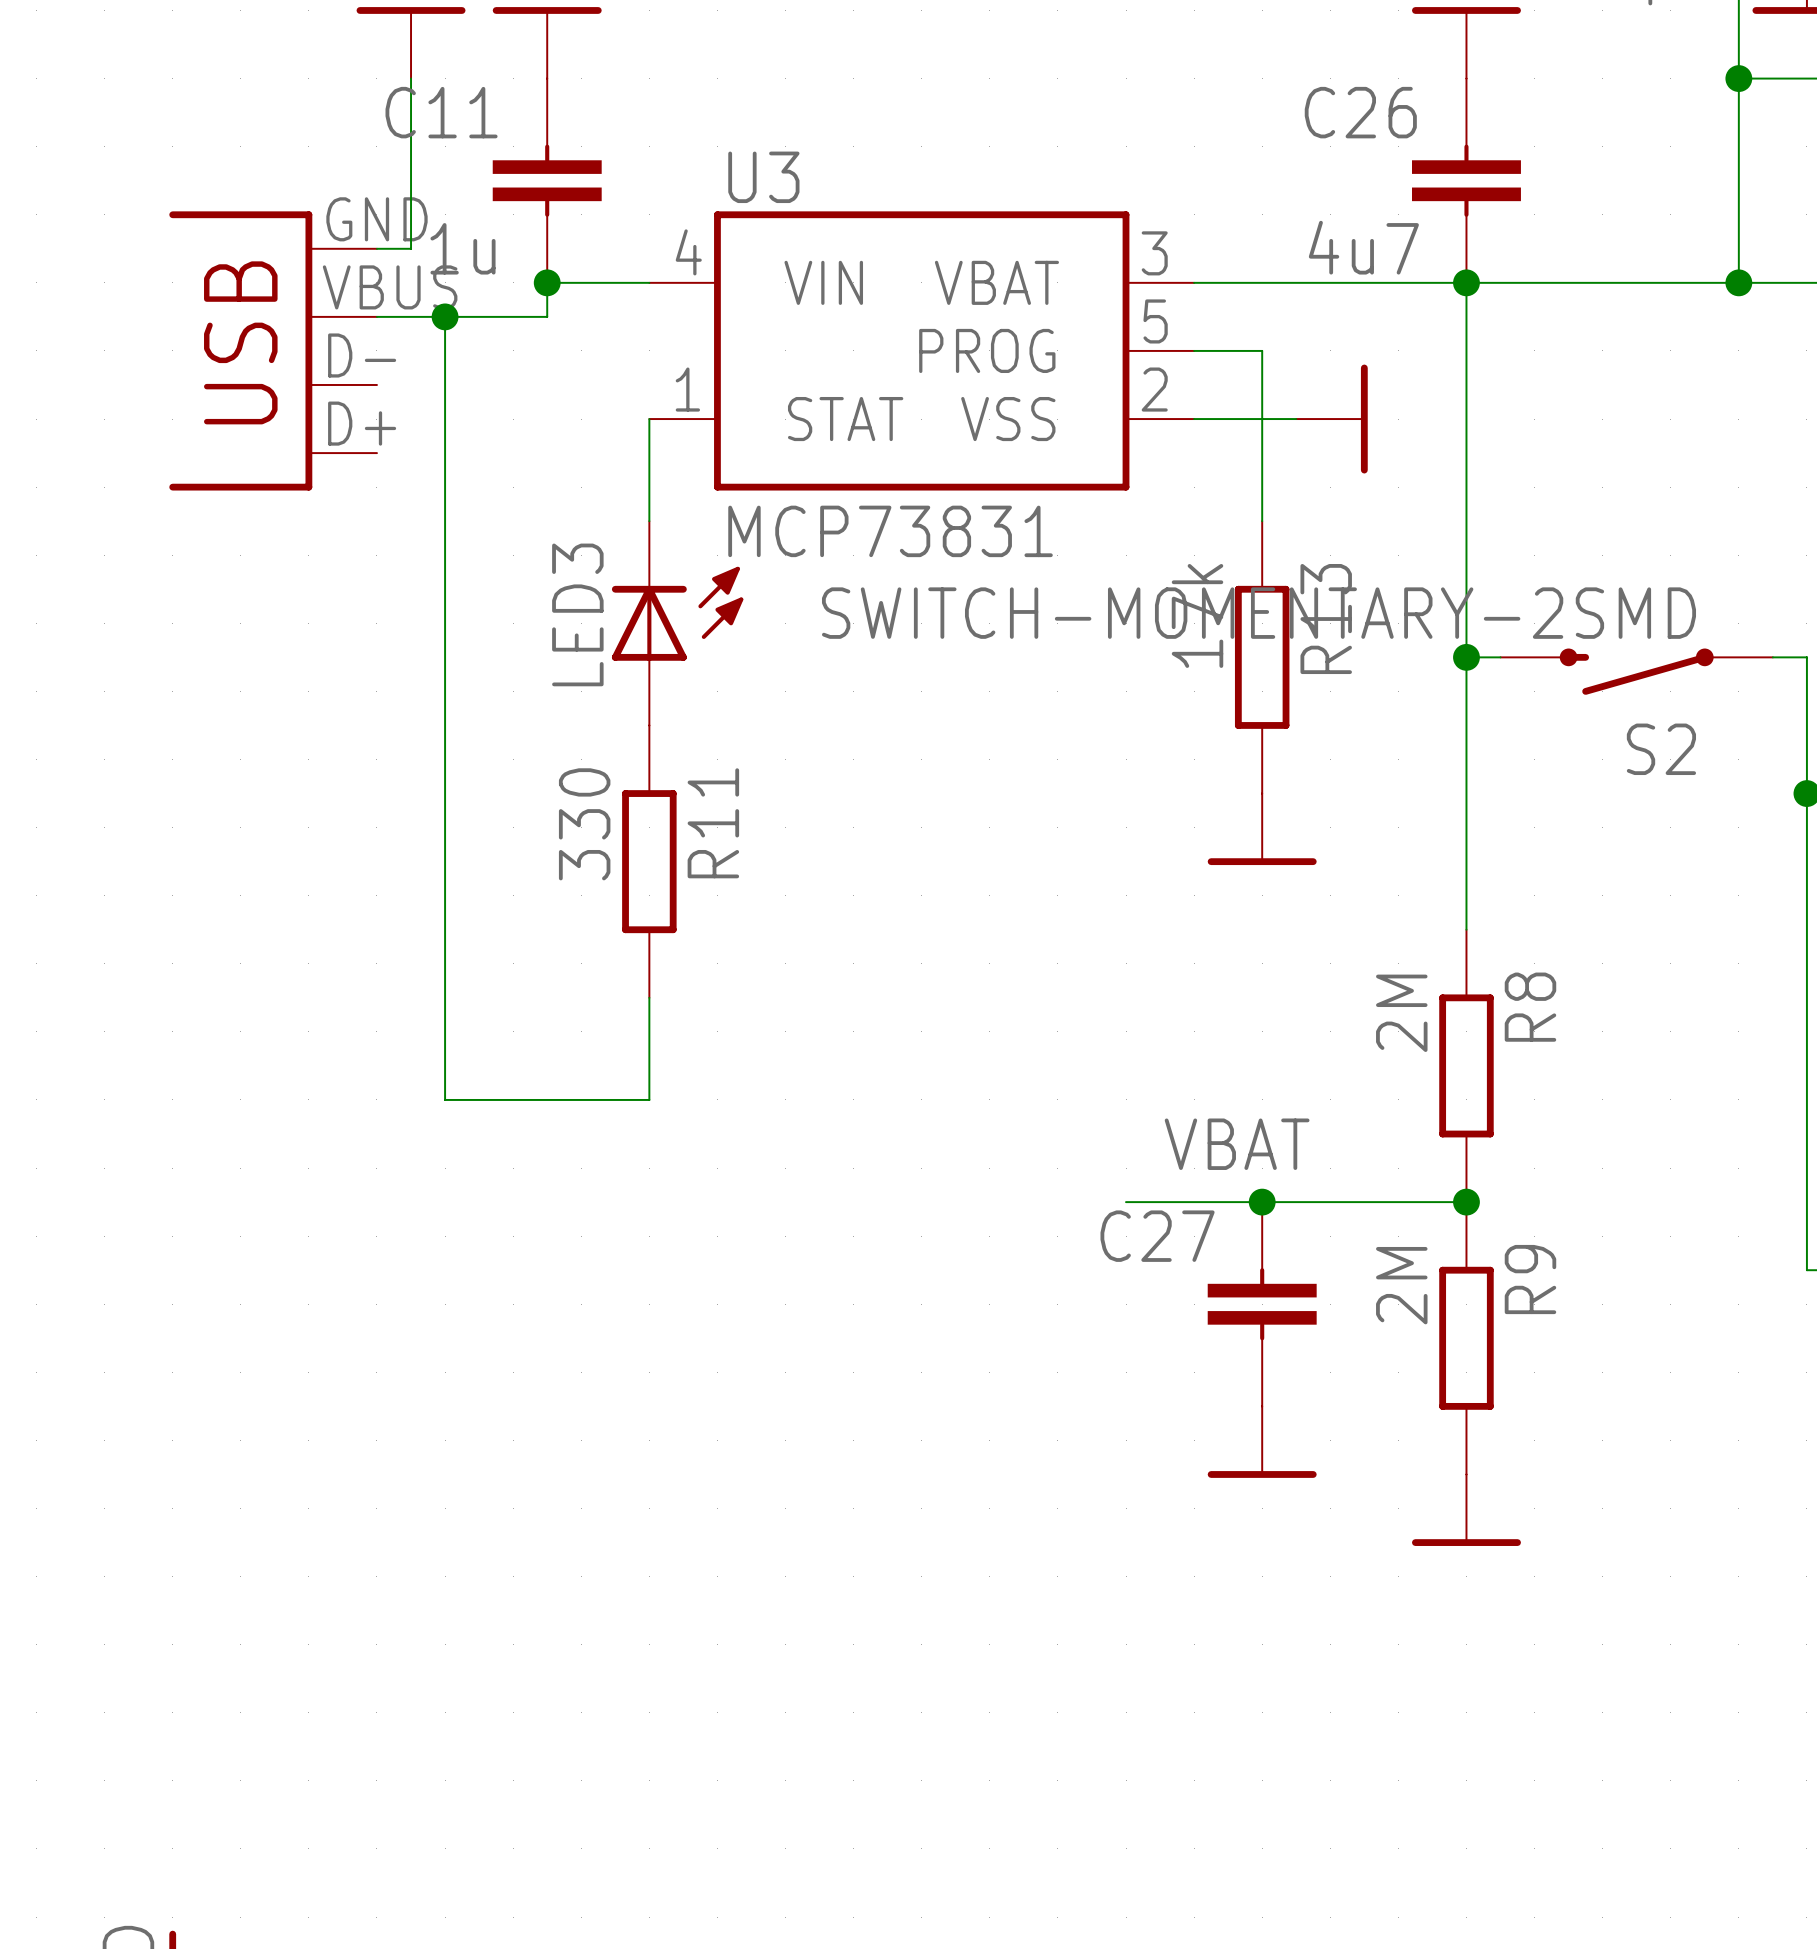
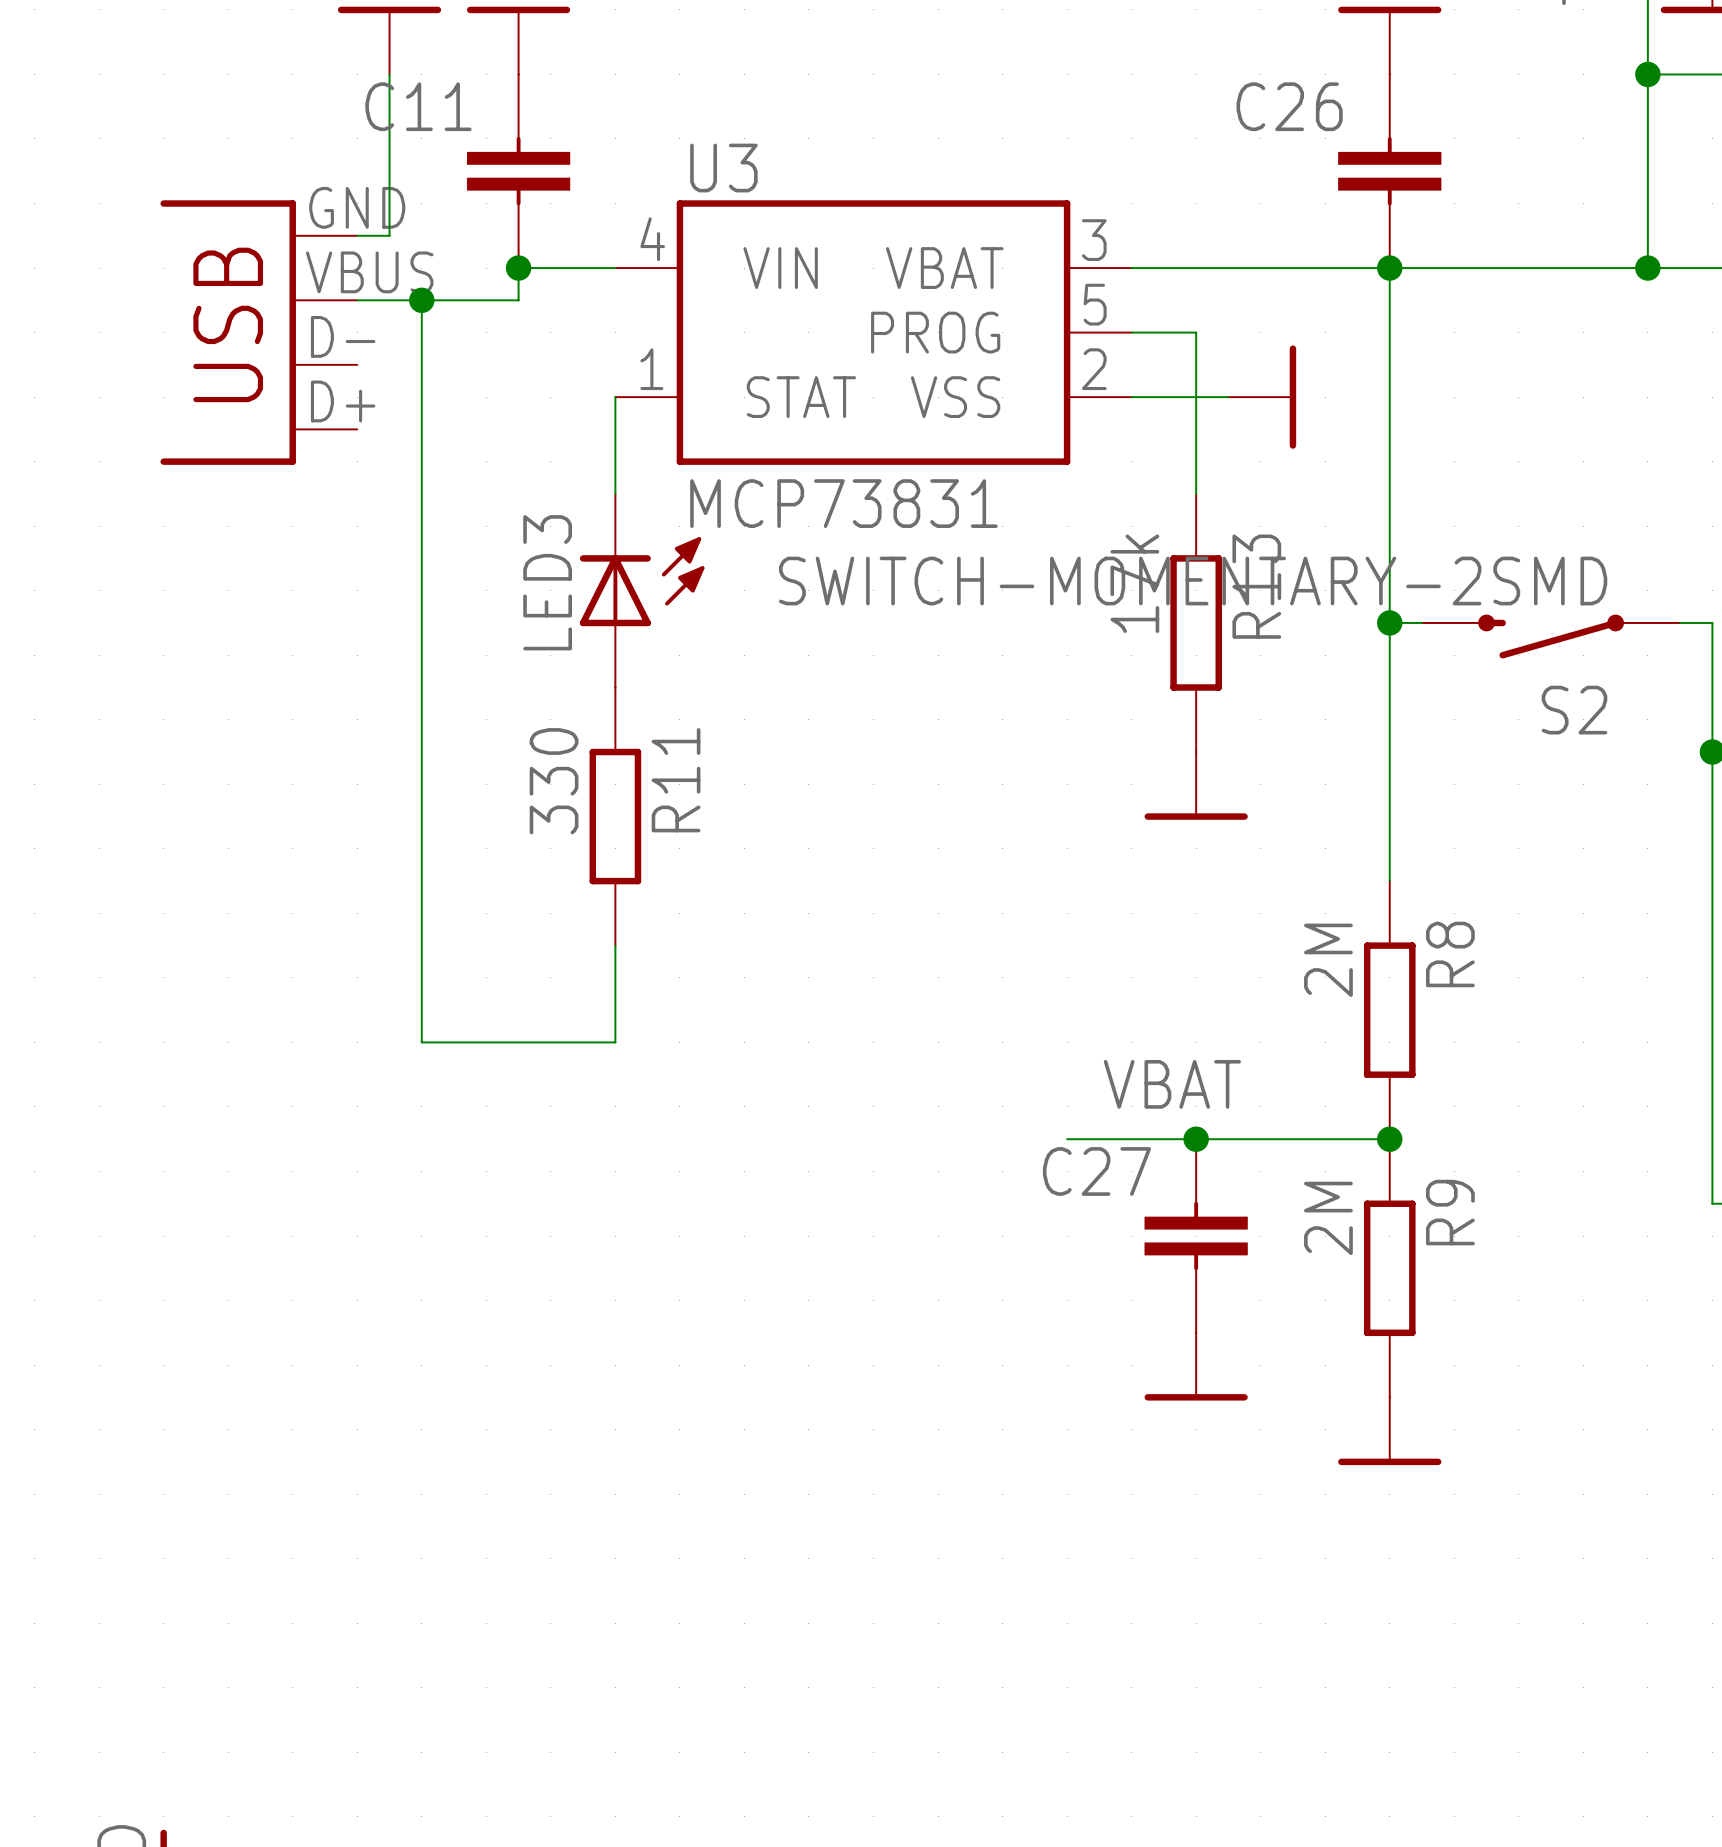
C26 value: 4u7 (1363, 247) -> none
C11 value: 1u (462, 248) -> none

